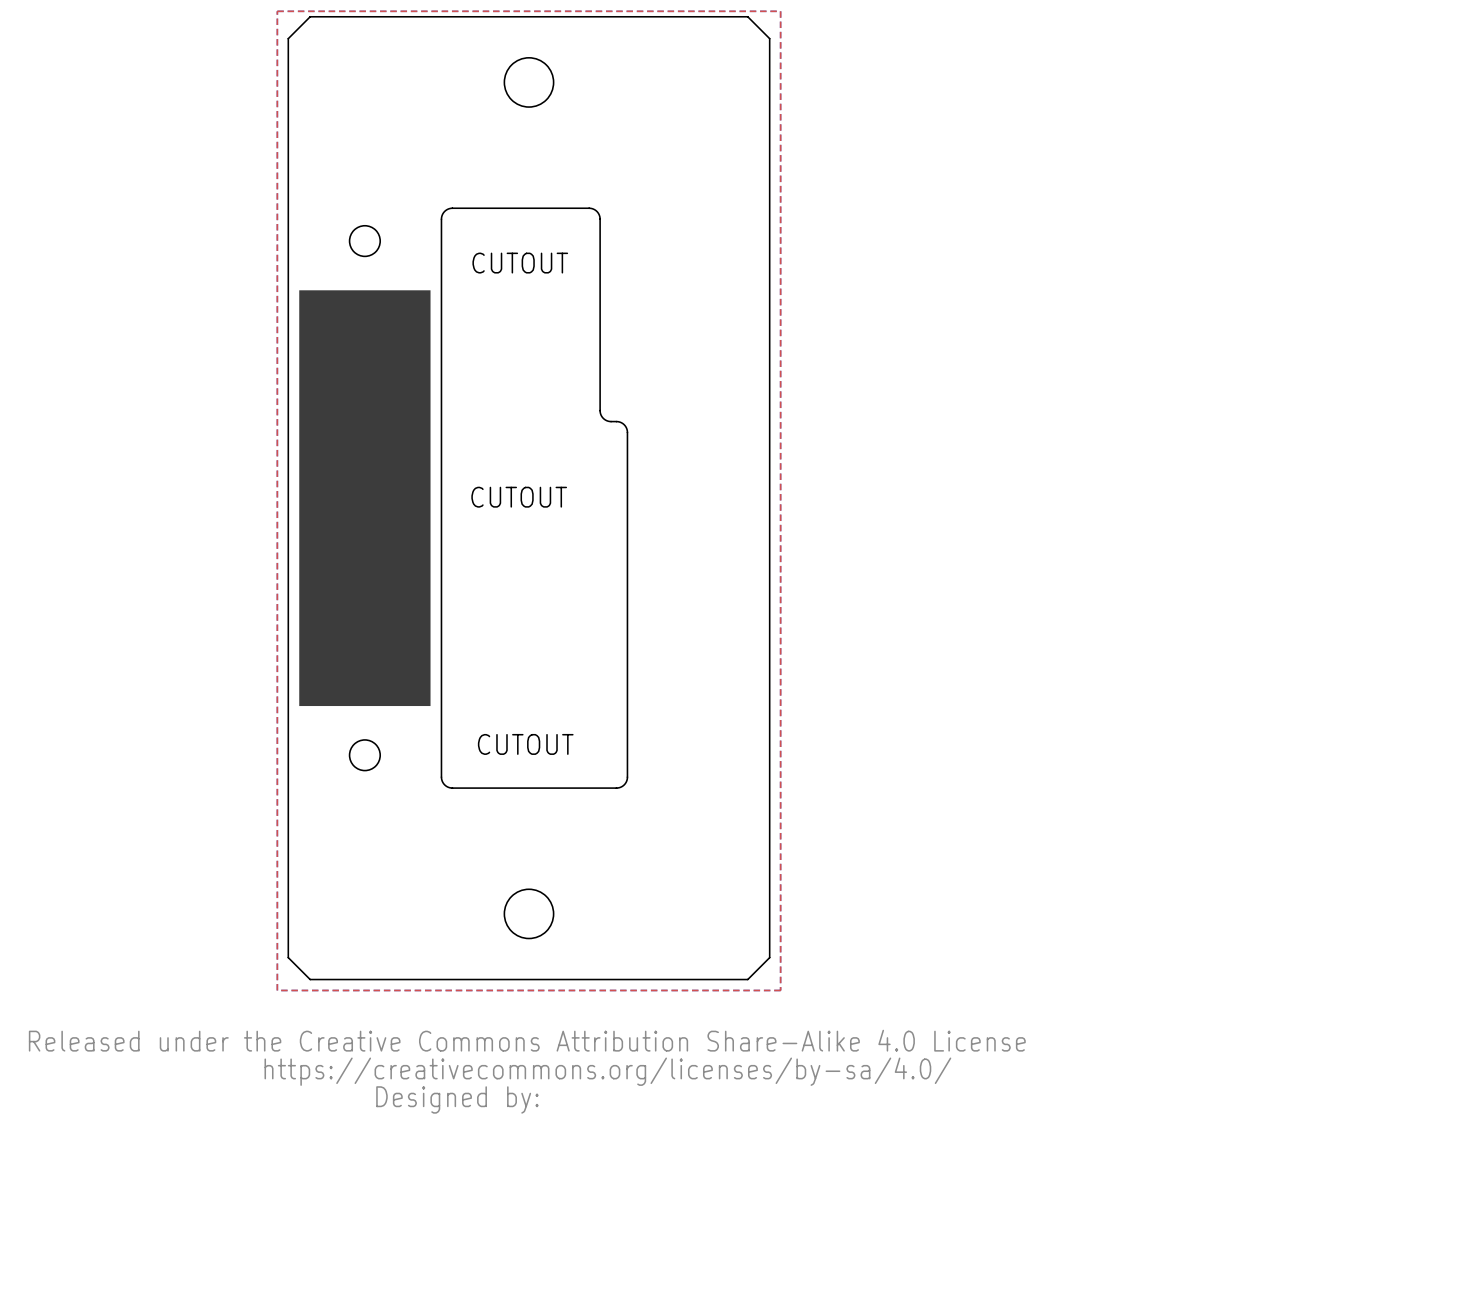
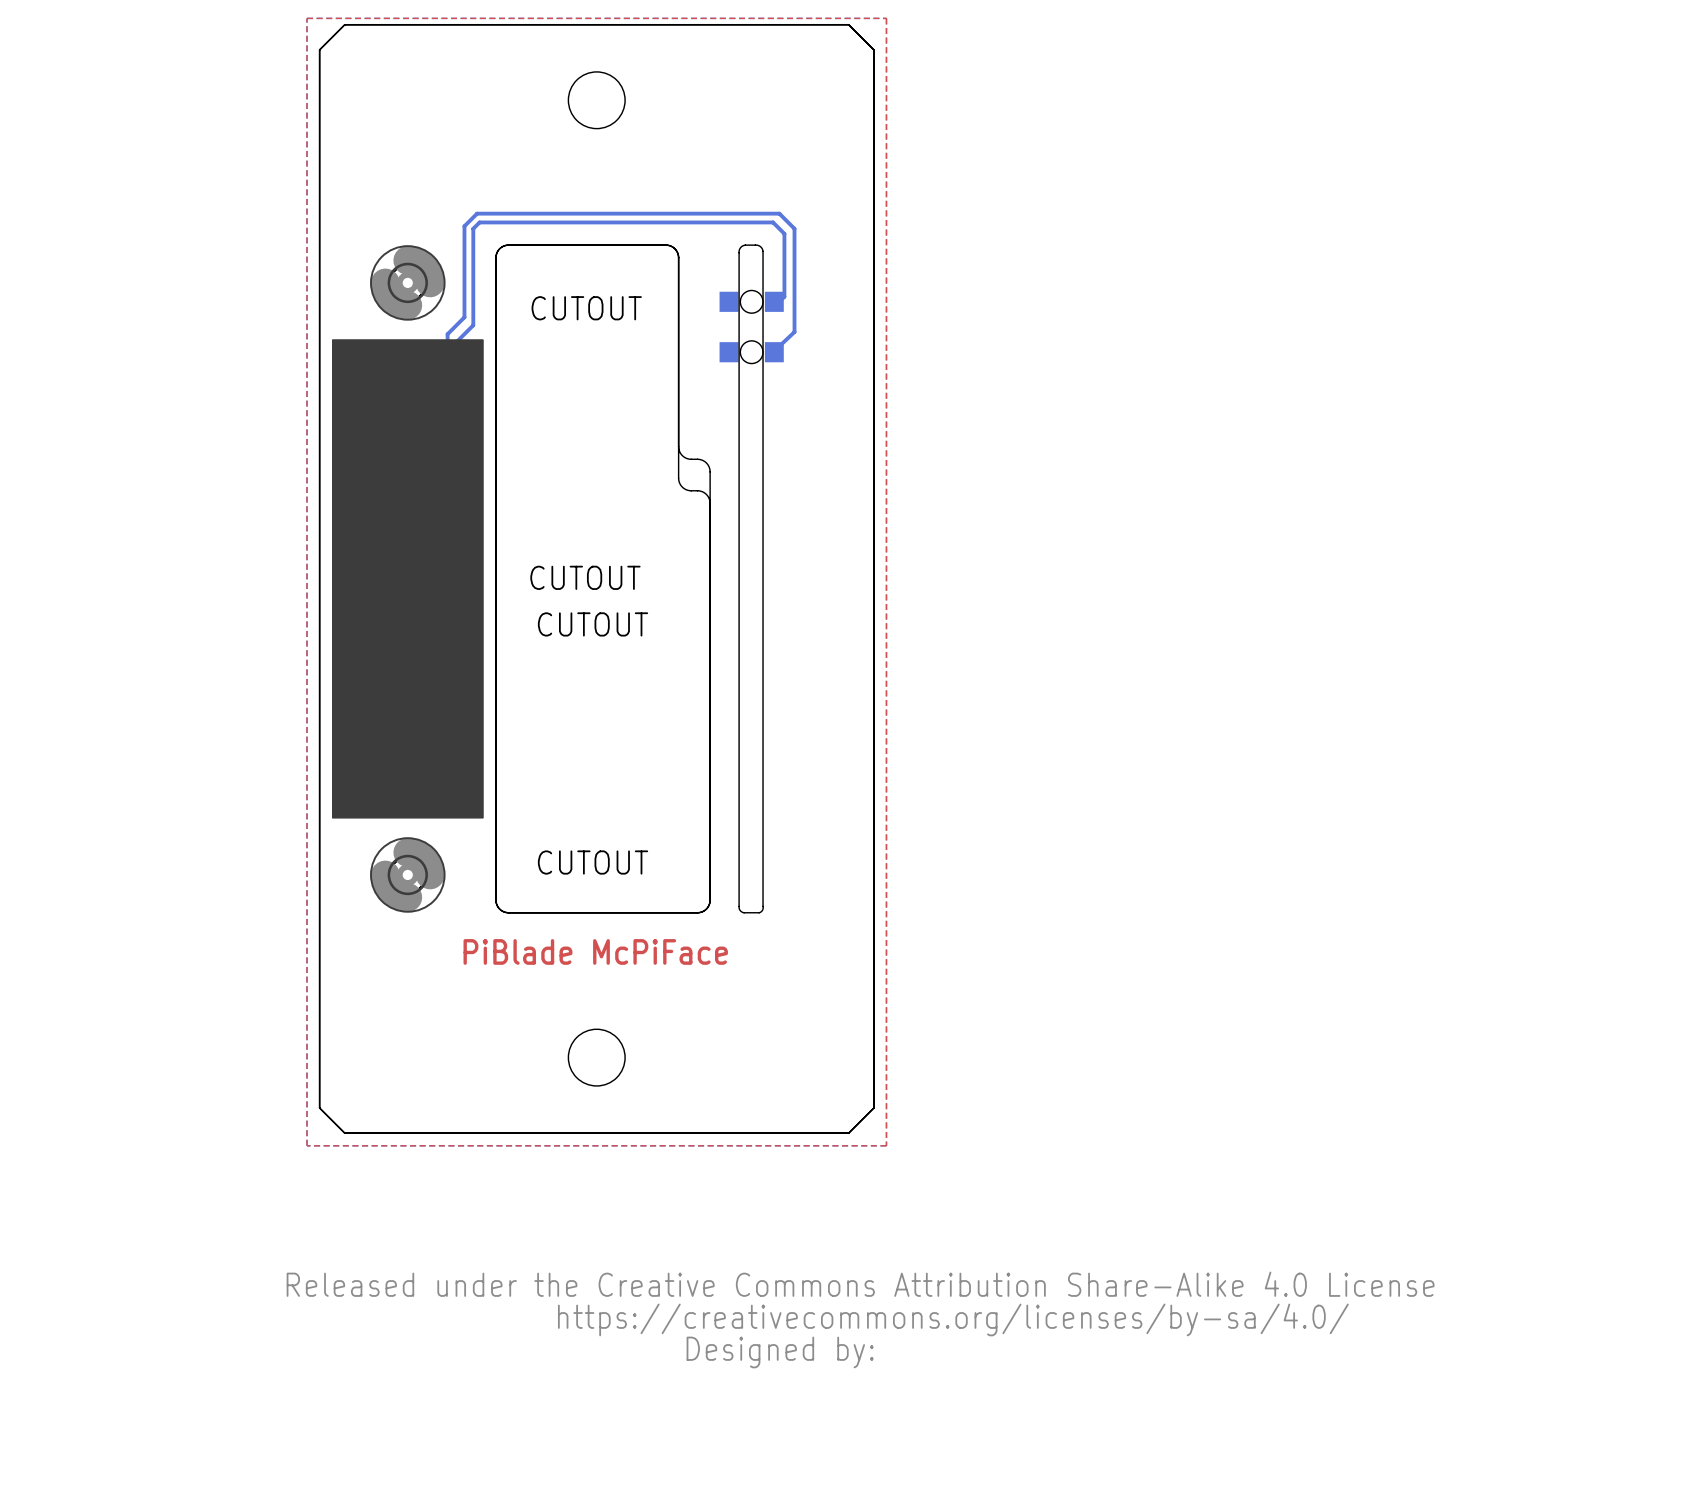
board edge: none -> (344, 24) (848, 24) (873, 49) (873, 1108) (848, 1133) (344, 1133) (319, 1108) (319, 49) (344, 24)
board edge: none -> (508, 245) (666, 245) (673, 247) (678, 254) (678, 448) (684, 457) (705, 461) (710, 471) (710, 900) (707, 907) (700, 912) (508, 912) (500, 910) (496, 903) (495, 257) (499, 248) (508, 245)
board edge: none -> (745, 245) (758, 245) (763, 251) (763, 907) (759, 912) (743, 912) (739, 907) (739, 251) (740, 247) (745, 245)
part: none -> (407, 282)
part: none -> (751, 301)
bottom track: none -> (771, 301) (779, 301) (784, 296) (784, 233) (773, 222) (479, 222) (473, 228) (473, 325) (455, 343) (455, 525) (446, 534) (425, 534)
drawing: none -> [332, 339, 484, 819]
part: none -> (751, 352)
bottom track: none -> (774, 352) (794, 332) (794, 228) (779, 213) (477, 213) (464, 226) (464, 317) (447, 334) (447, 485) (442, 490) (425, 490)
text: none -> CUTOUT (593, 624)
part: none -> (407, 874)
text: none -> PiBlade McPiFace (595, 951)
drawing position: (527, 1071) -> (860, 1319)

